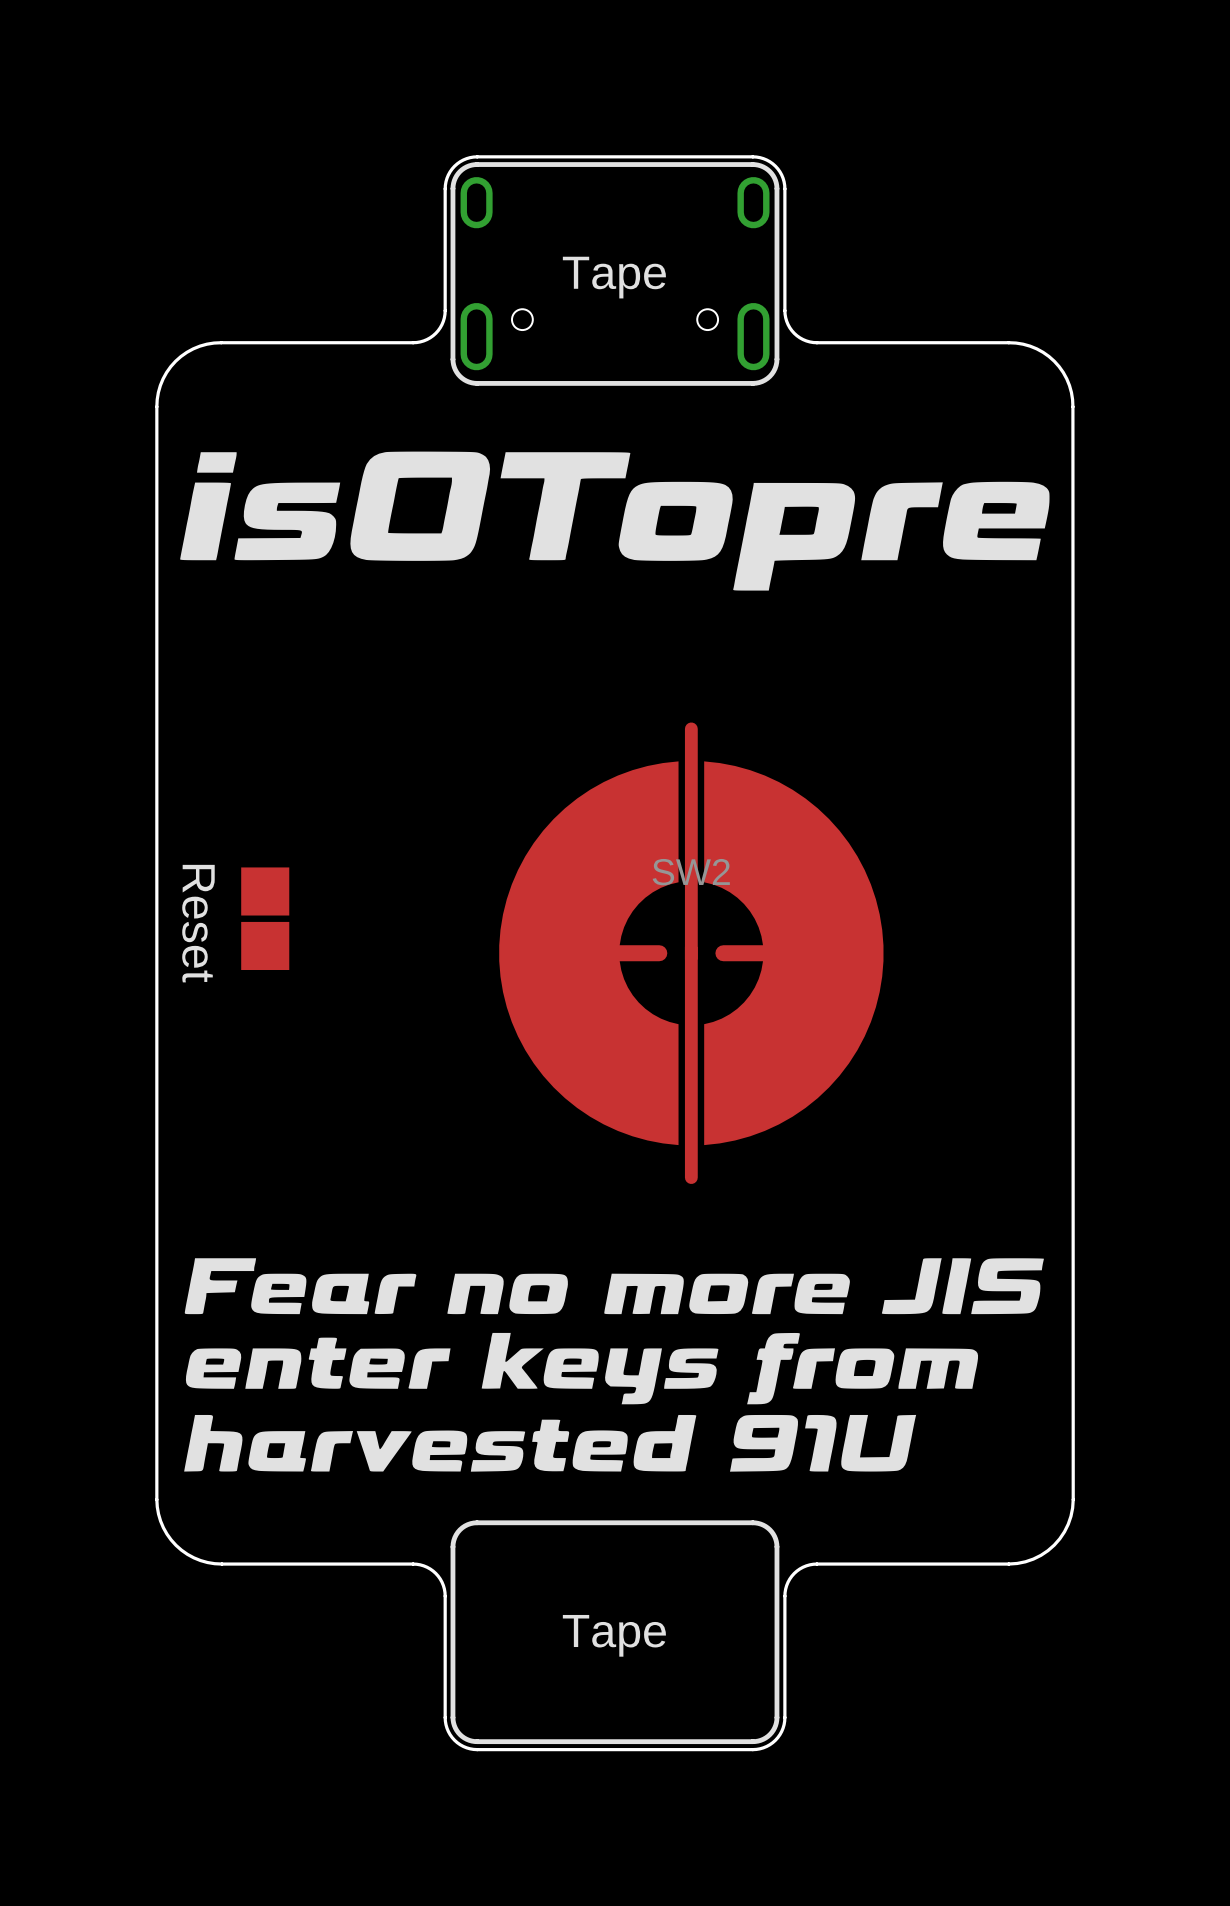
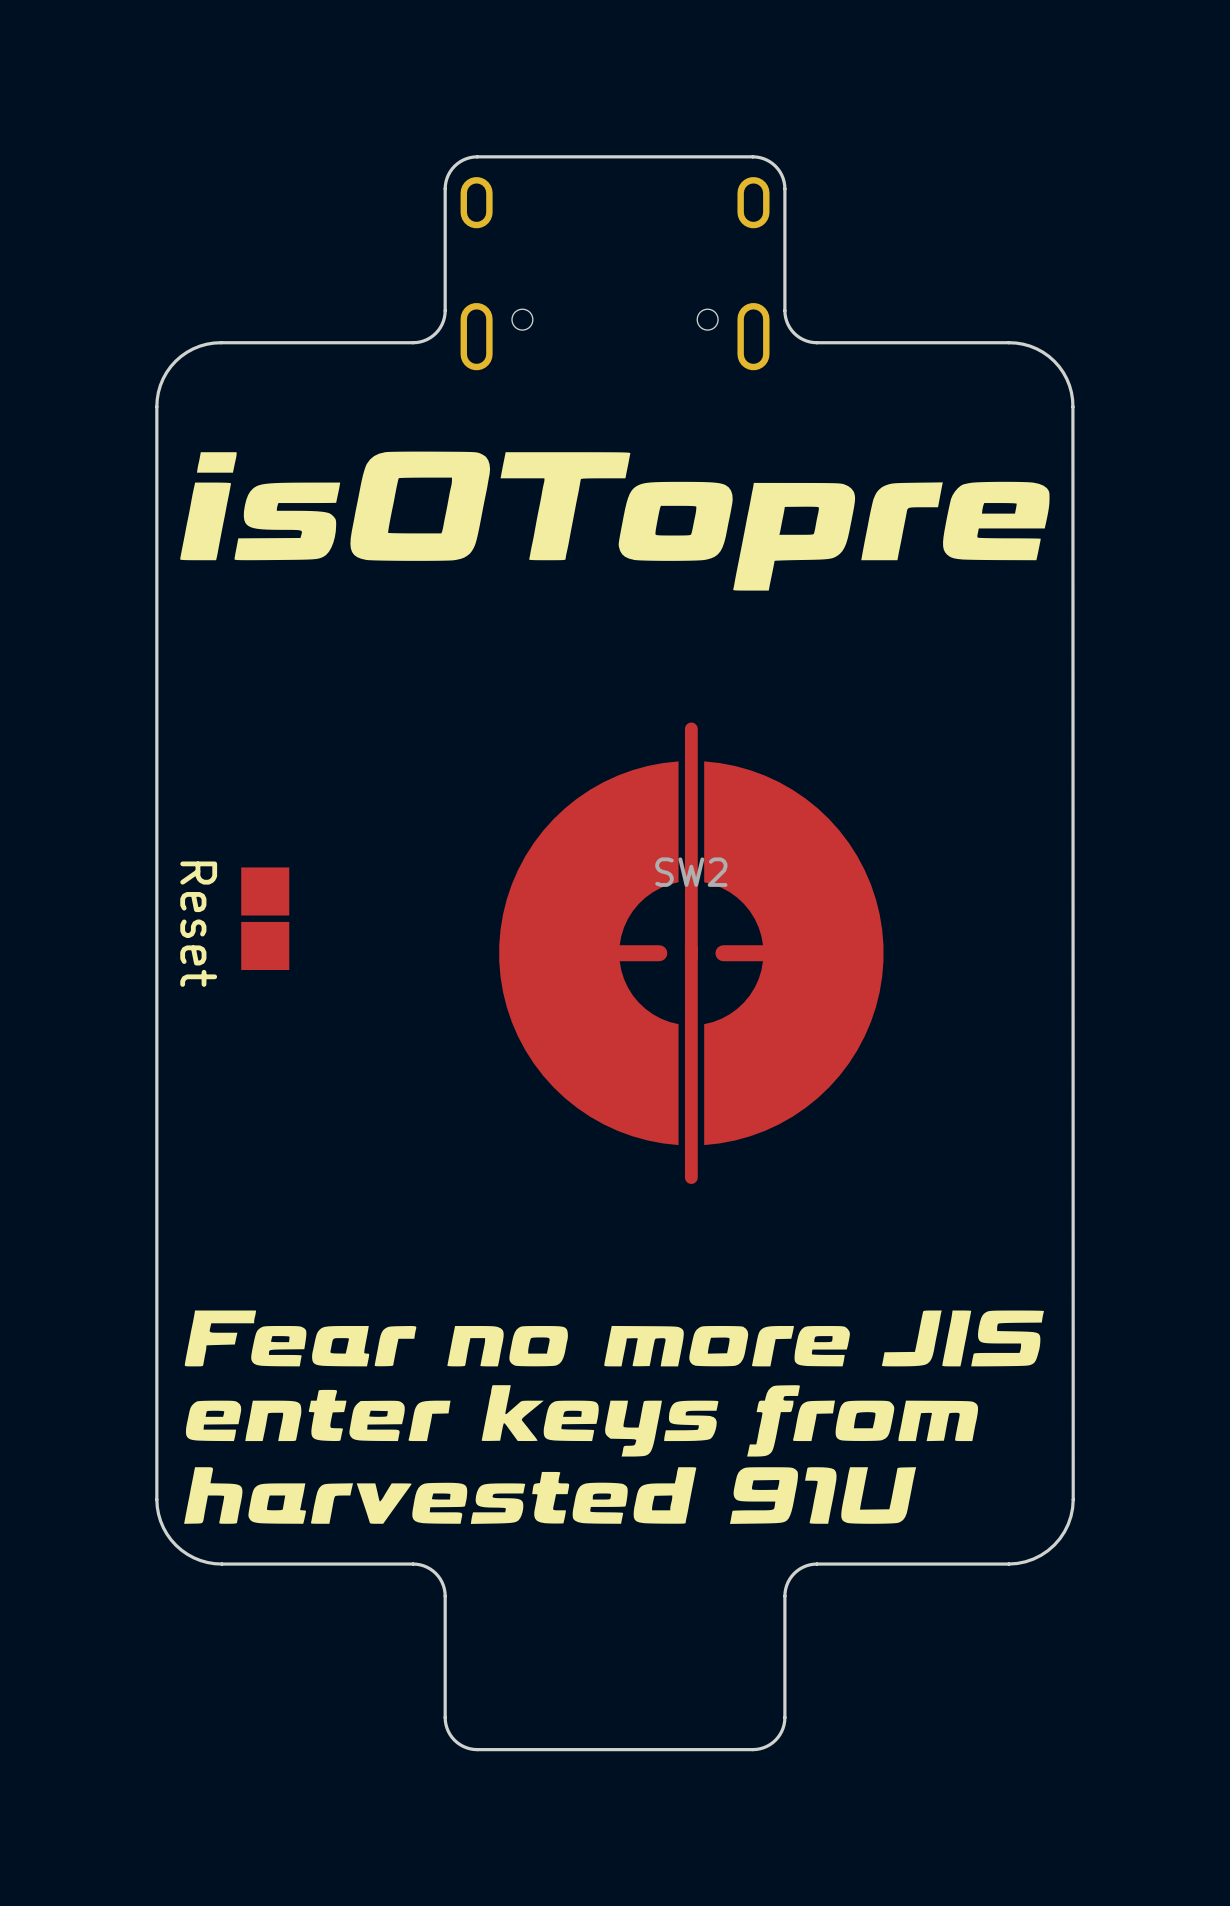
line: (477, 164) (752, 164) (767, 169) (774, 178) (776, 188) (776, 359) (772, 373) (764, 380) (752, 383) (477, 383) (462, 378) (455, 369) (452, 359) (453, 185) (456, 175) (462, 169) (477, 164) -> none
text: Tape (614, 277) -> none
drawing position: (614, 1286) -> (614, 1338)
drawing position: (581, 1368) -> (581, 1420)
drawing position: (550, 1443) -> (550, 1495)
line: (476, 1522) (752, 1522) (765, 1526) (773, 1533) (776, 1546) (776, 1717) (773, 1730) (763, 1739) (752, 1741) (477, 1741) (464, 1738) (456, 1730) (453, 1720) (452, 1546) (454, 1537) (459, 1529) (467, 1524) (476, 1522) -> none
text: Tape (614, 1635) -> none

